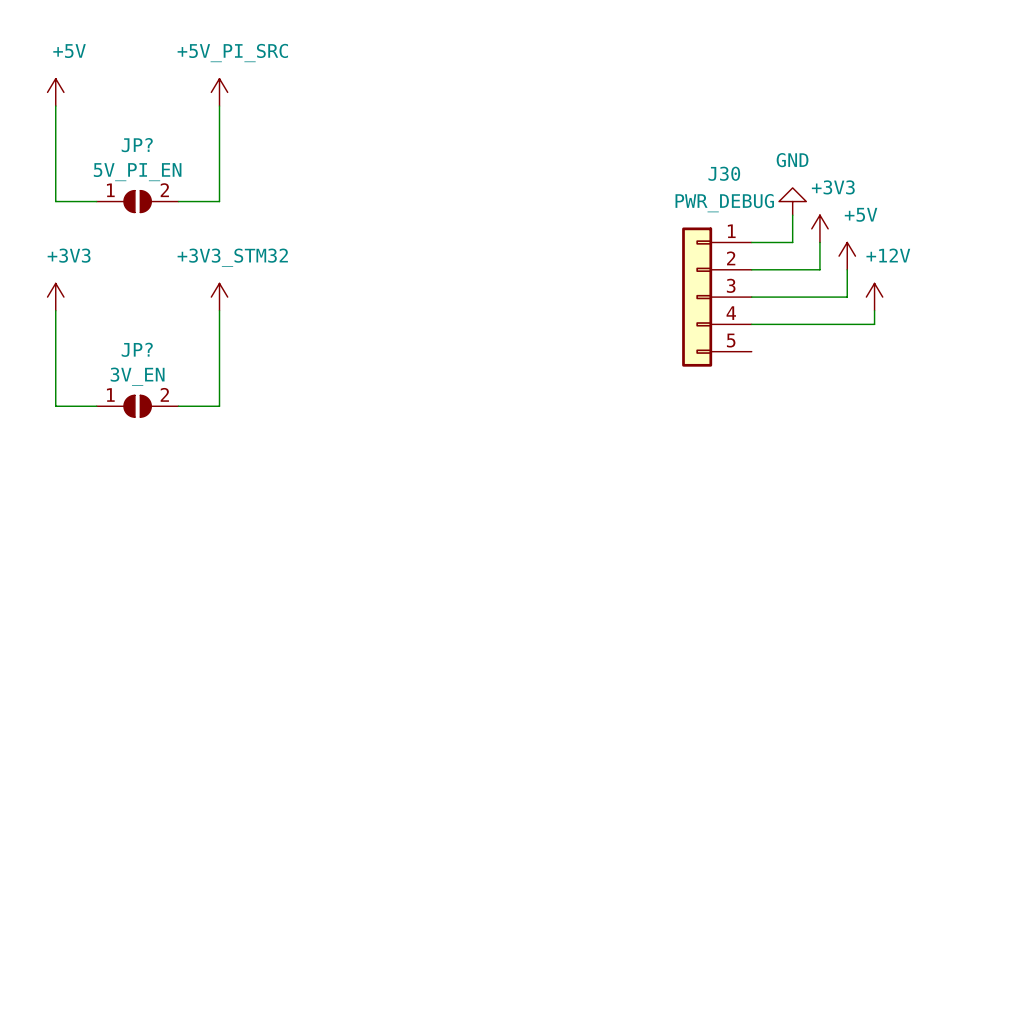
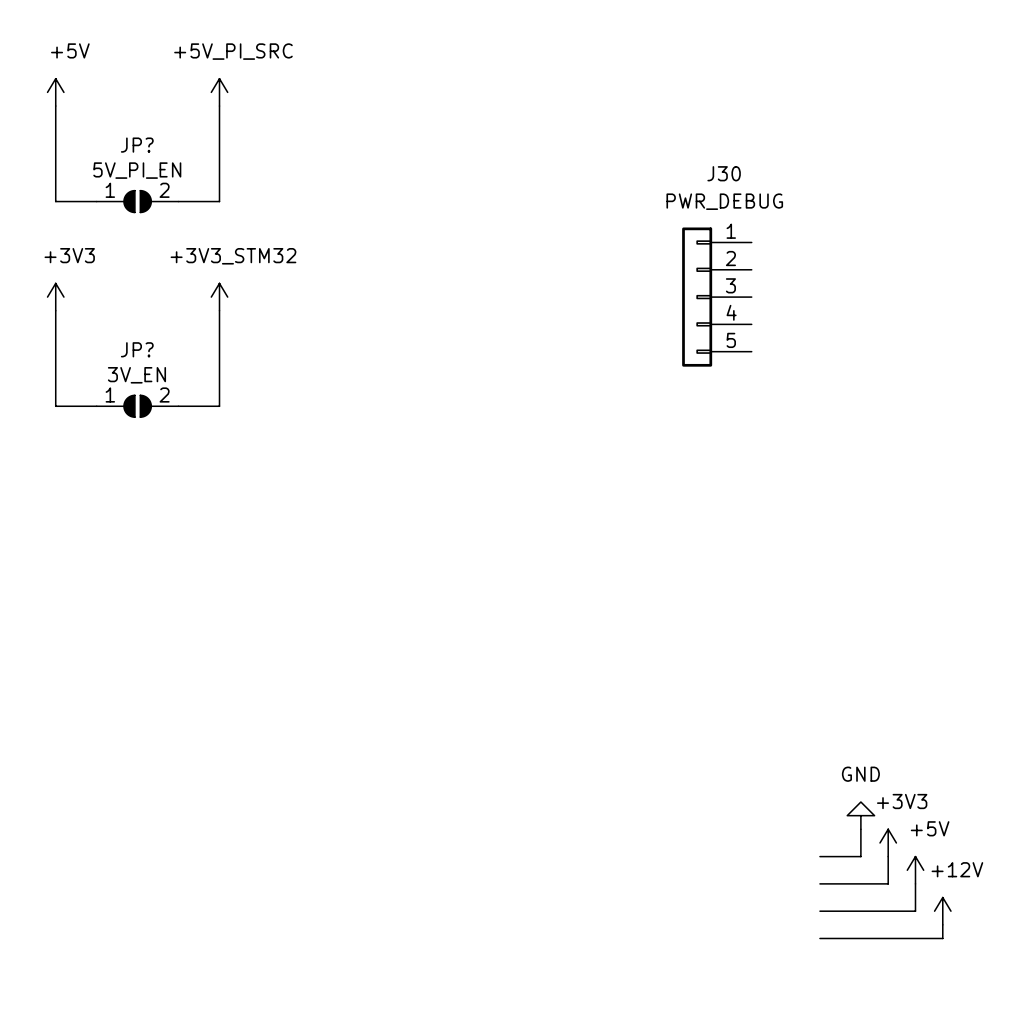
power symbol: GND (792, 201) -> none
wire: (792, 215) (792, 242) (751, 242) -> none
power symbol: +3V3 (819, 228) -> none
wire: (819, 242) (819, 269) (751, 269) -> none
power symbol: +5V (847, 256) -> none
wire: (847, 269) (847, 297) (751, 297) -> none
power symbol: +12V (874, 297) -> none
wire: (874, 310) (874, 324) (751, 324) -> none
power symbol: none -> GND (860, 815)
wire: none -> (860, 829) (860, 856) (819, 856)
power symbol: none -> +3V3 (888, 842)
wire: none -> (888, 856) (888, 883) (819, 883)
power symbol: none -> +5V (915, 870)
wire: none -> (915, 883) (915, 911) (819, 911)
power symbol: none -> +12V (942, 911)
wire: none -> (942, 924) (942, 938) (819, 938)

